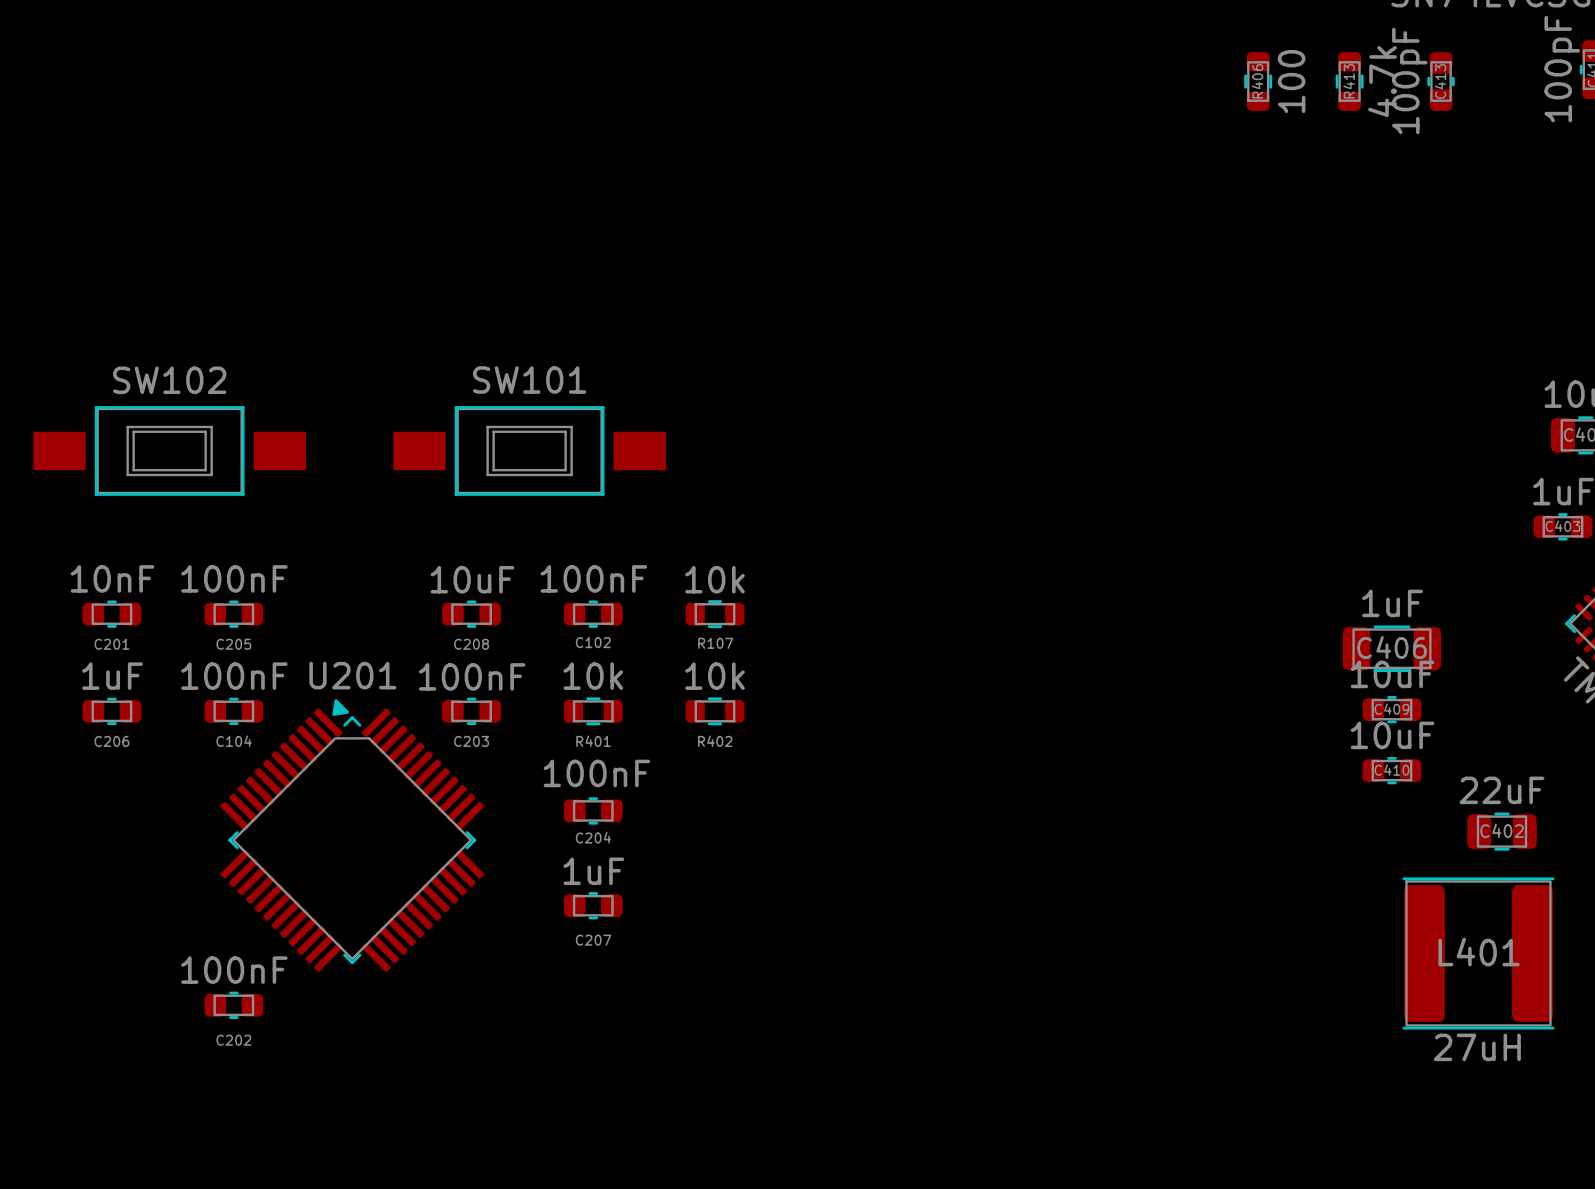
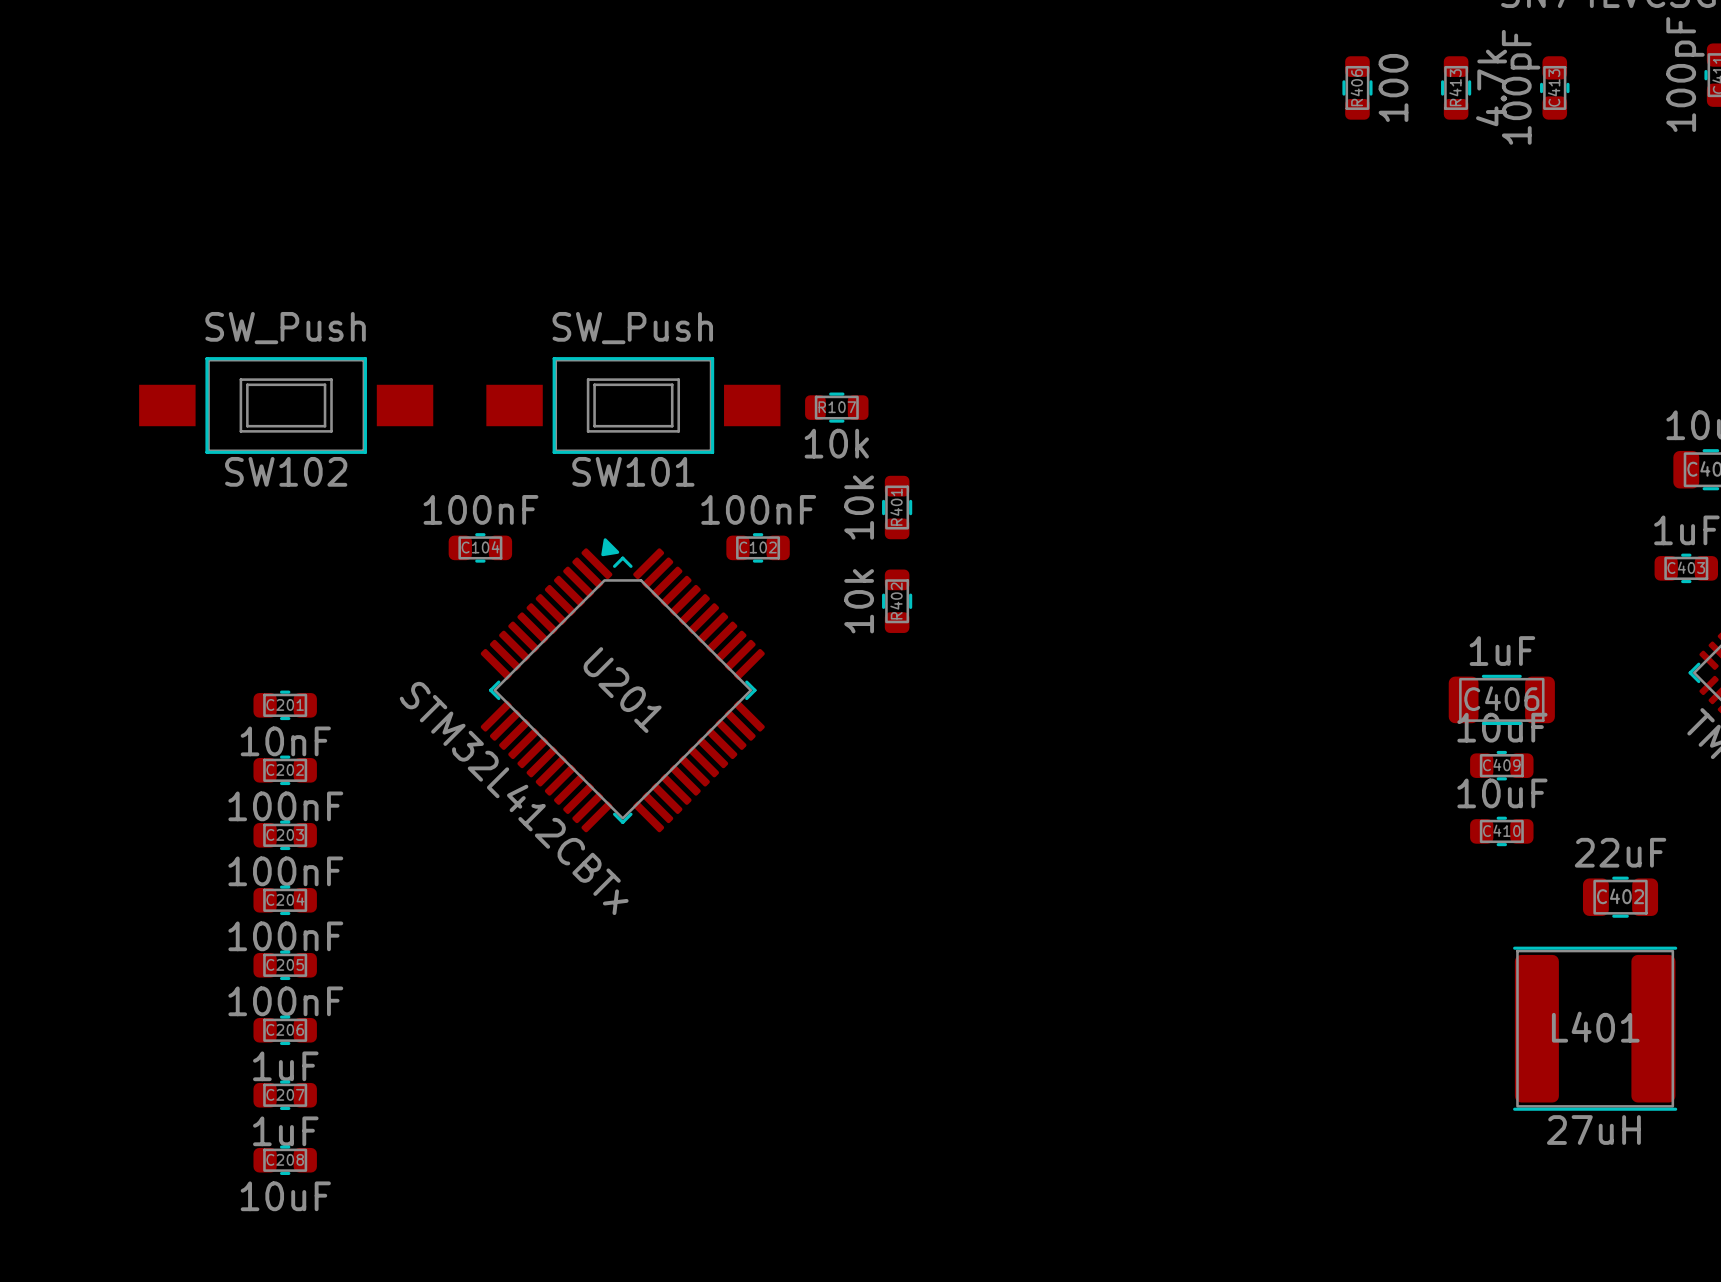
SW102 value: none -> SW_Push (285, 328)
SW101 value: none -> SW_Push (632, 328)
SW102 name position: SW102 (169, 380) -> SW102 (286, 471)
SW101 name position: SW101 (529, 380) -> SW101 (633, 471)
SW102 position: (169, 450) -> (286, 405)
SW101 position: (529, 450) -> (633, 405)
C201 value position: 10nF (112, 578) -> 10nF (285, 741)
C205 value position: 100nF (234, 578) -> 100nF (285, 1001)
C208 value position: 10uF (472, 579) -> 10uF (285, 1196)
R107 value position: 10k (715, 579) -> 10k (836, 443)
C201 position: (111, 614) -> (285, 705)
C205 position: (233, 614) -> (285, 965)
C208 position: (471, 614) -> (285, 1160)
C102 position: (593, 614) -> (758, 547)
R107 position: (715, 614) -> (836, 407)
C102 name position: C102 (593, 642) -> C102 (758, 547)
R107 name position: R107 (715, 643) -> R107 (837, 407)
C201 name position: C201 (111, 644) -> C201 (285, 704)
C205 name position: C205 (233, 644) -> C205 (285, 964)
C208 name position: C208 (471, 644) -> C208 (285, 1159)
U201 name rotation: 0° (352, 675) -> 45° clockwise (622, 690)
U201 name position: U201 (352, 675) -> U201 (622, 690)
C206 value position: 1uF (112, 676) -> 1uF (285, 1066)
C203 value position: 100nF (472, 676) -> 100nF (285, 871)
R401 value position: 10k (593, 676) -> 10k (859, 507)
R402 value position: 10k (715, 676) -> 10k (859, 601)
C206 position: (111, 711) -> (285, 1030)
C104 position: (233, 711) -> (480, 547)
C203 position: (471, 711) -> (285, 835)
R401 rotation: 0° (593, 711) -> 90° clockwise (897, 507)
R401 position: (593, 711) -> (897, 507)
R402 rotation: 0° (715, 711) -> 90° clockwise (897, 601)
R402 position: (715, 711) -> (897, 601)
U201 value: none -> STM32L412CBTx (514, 798)
C206 name position: C206 (111, 741) -> C206 (285, 1029)
C104 name position: C104 (234, 741) -> C104 (480, 547)
C203 name position: C203 (471, 741) -> C203 (285, 834)
C204 value position: 100nF (596, 773) -> 100nF (285, 936)
C204 position: (593, 810) -> (285, 900)
U201 position: (352, 835) -> (622, 685)
C204 name position: C204 (593, 837) -> C204 (285, 899)
C207 value position: 1uF (593, 871) -> 1uF (285, 1131)
C207 position: (593, 905) -> (285, 1095)
C207 name position: C207 (593, 940) -> C207 (285, 1094)
C202 value position: 100nF (234, 970) -> 100nF (285, 806)
C202 position: (233, 1005) -> (285, 770)
C202 name position: C202 (233, 1040) -> C202 (285, 769)

